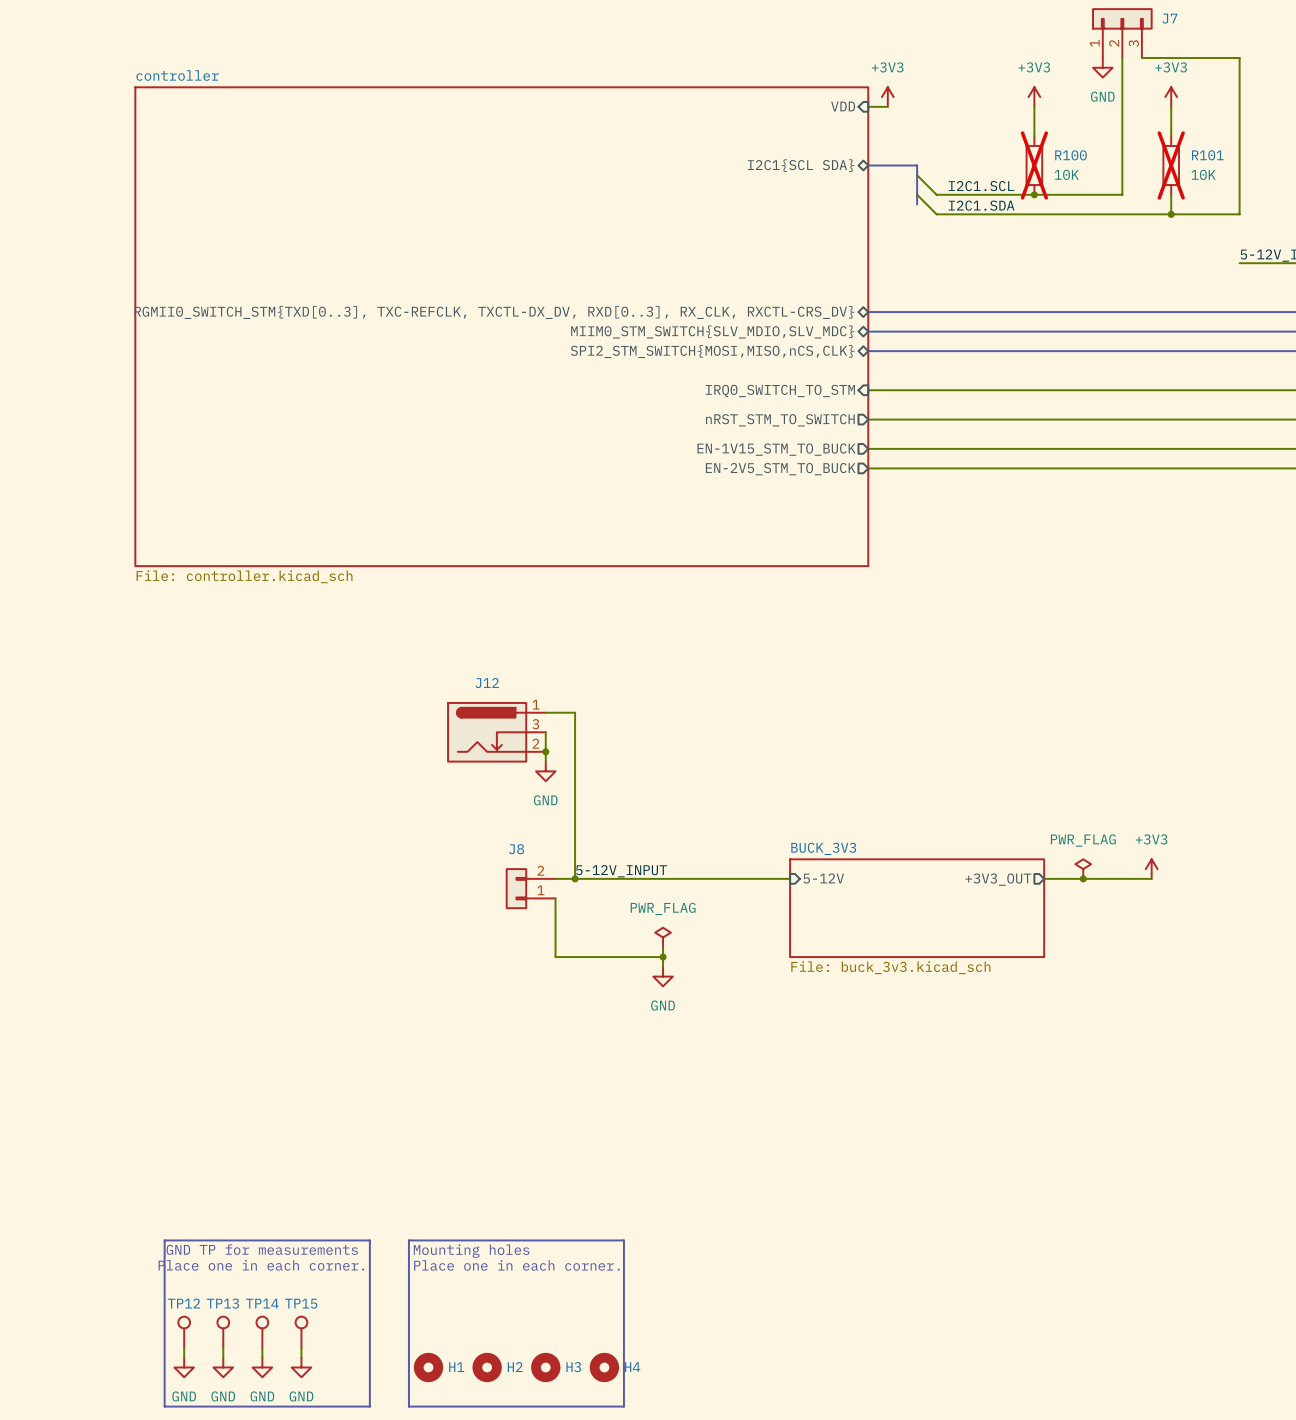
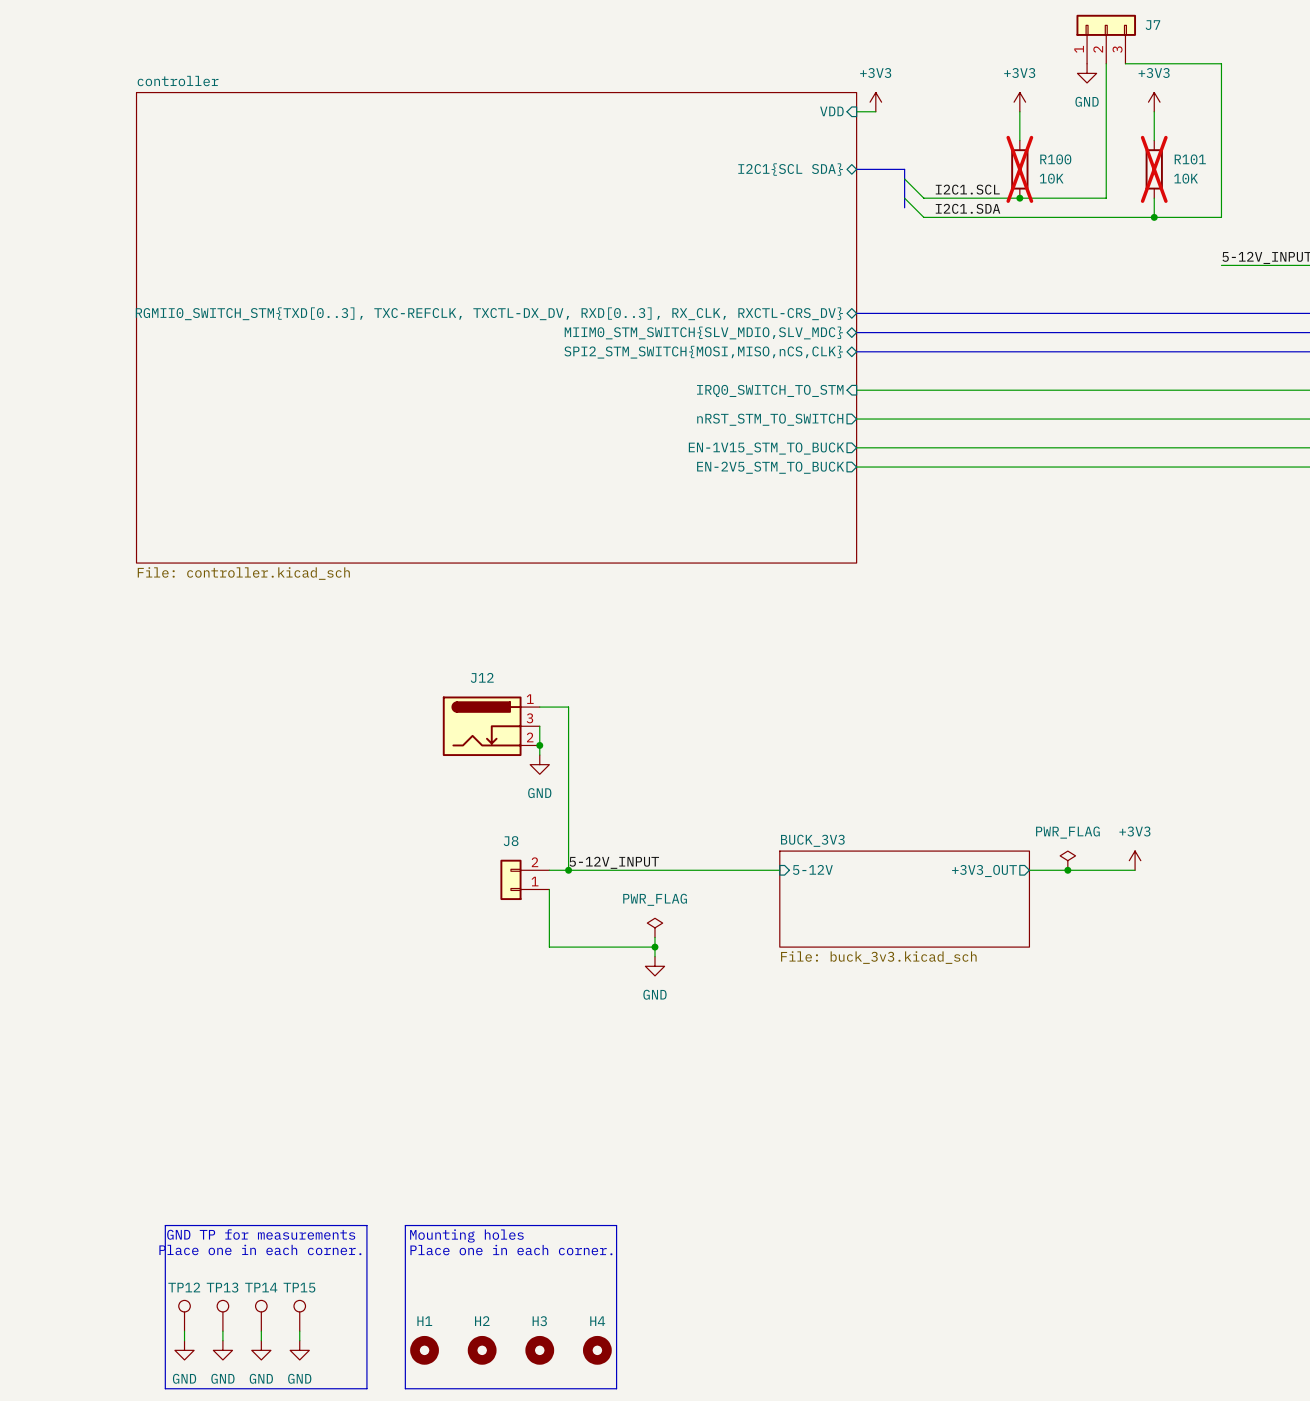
H1 name position: H1 (456, 1367) -> H1 (424, 1321)
H2 name position: H2 (515, 1367) -> H2 (482, 1321)
H3 name position: H3 (573, 1367) -> H3 (539, 1321)
H4 name position: H4 (632, 1367) -> H4 (597, 1321)

